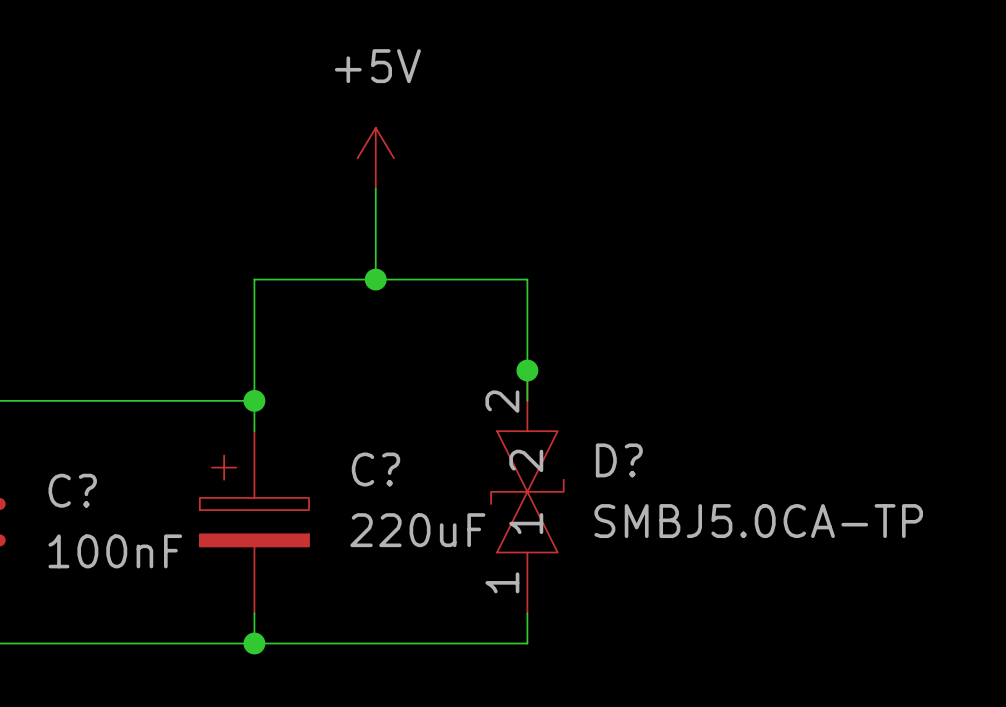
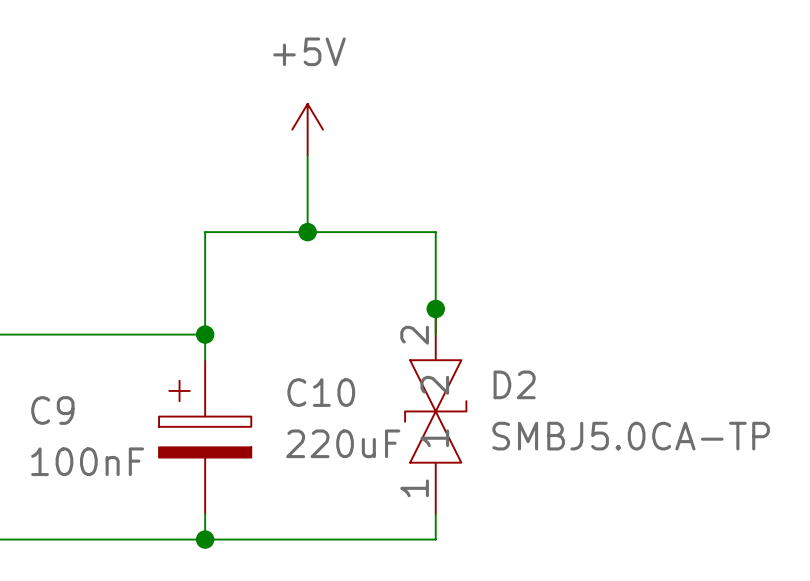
D? name: D? (619, 460) -> D2 (514, 384)
C? name: C? (375, 469) -> C10 (321, 392)
C? name: C? (72, 490) -> C9 (52, 410)

